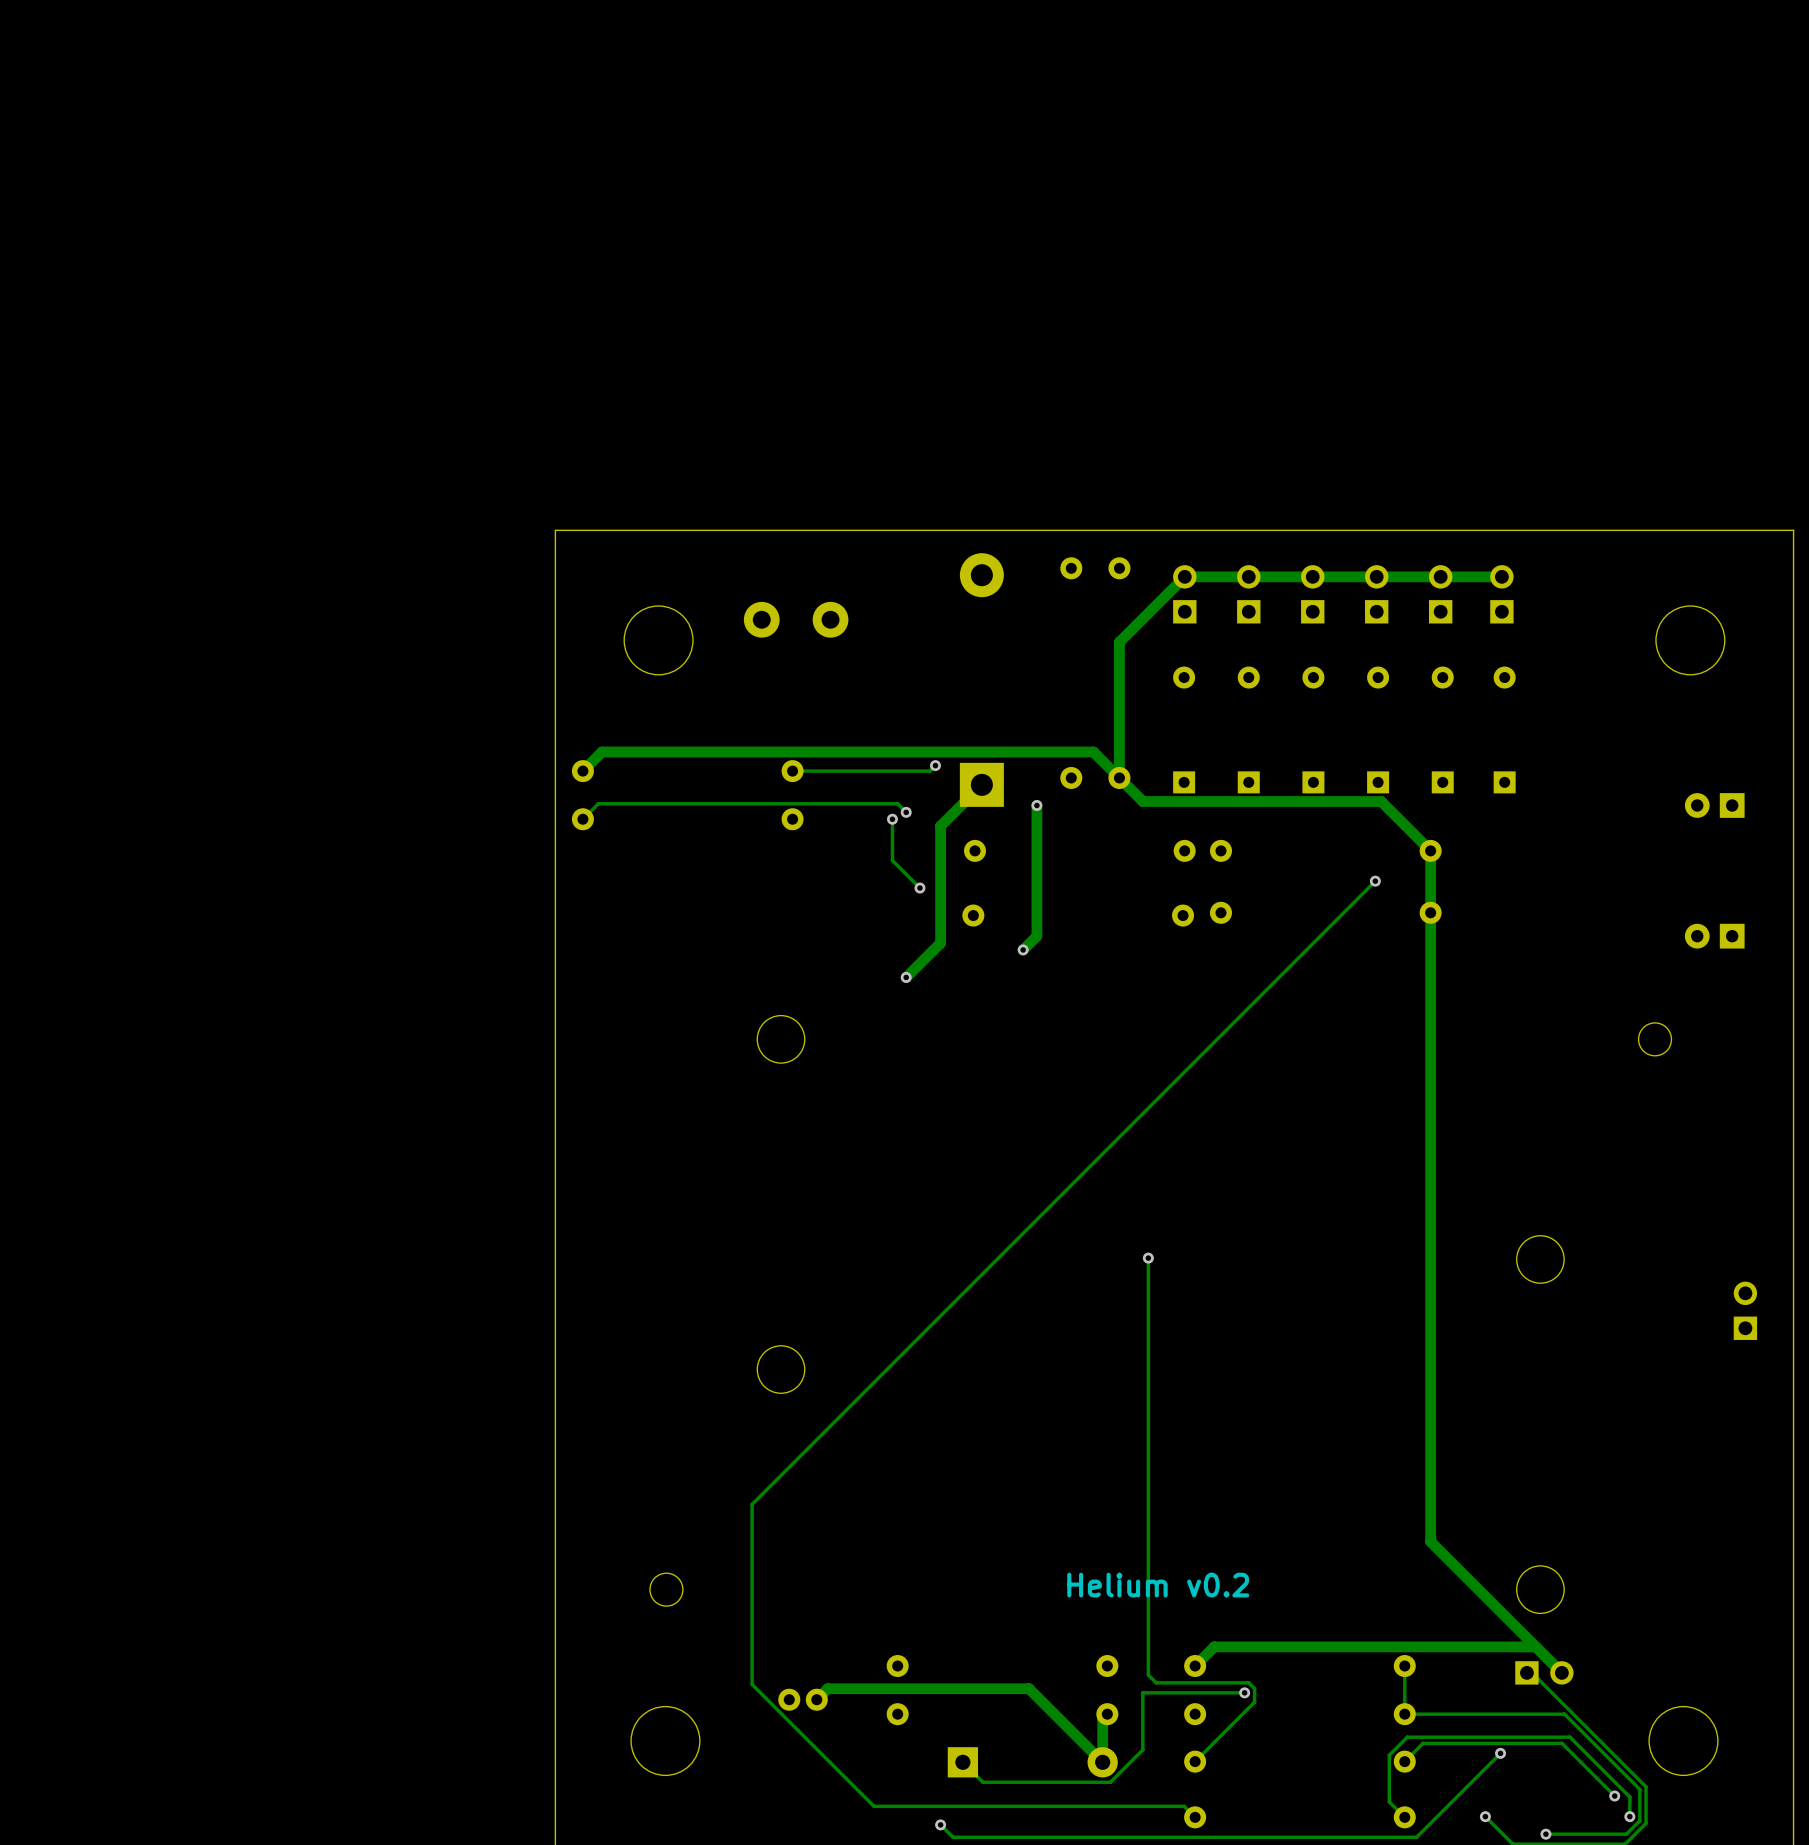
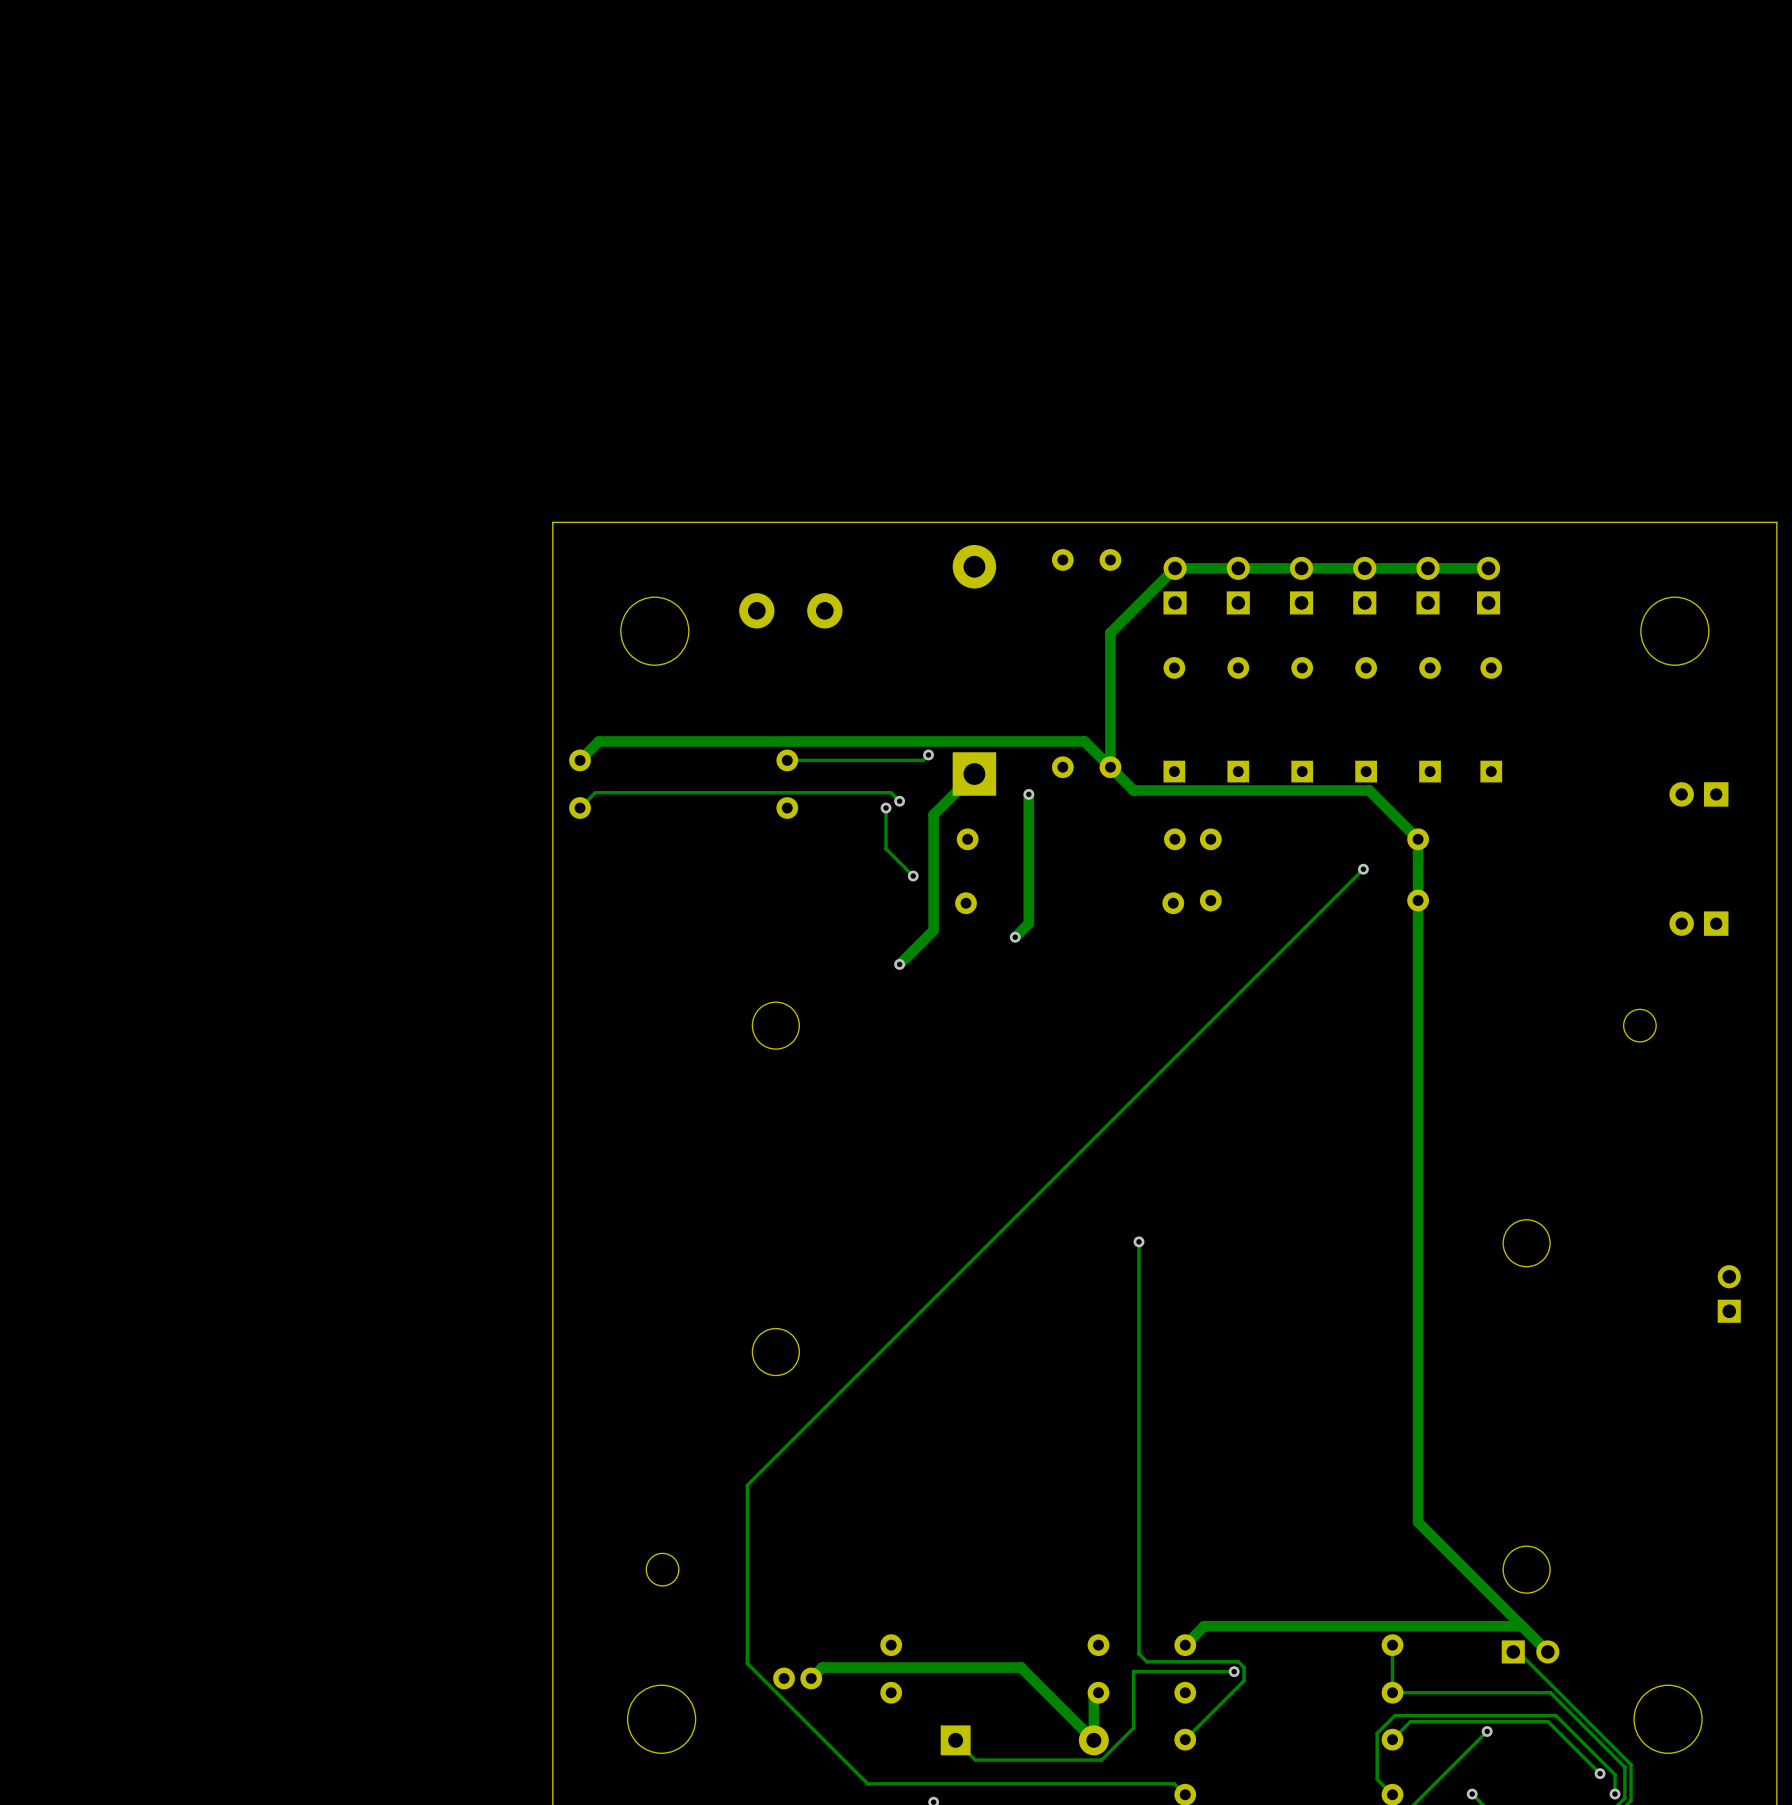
text: Helium v0.2 (1158, 1585) -> none

